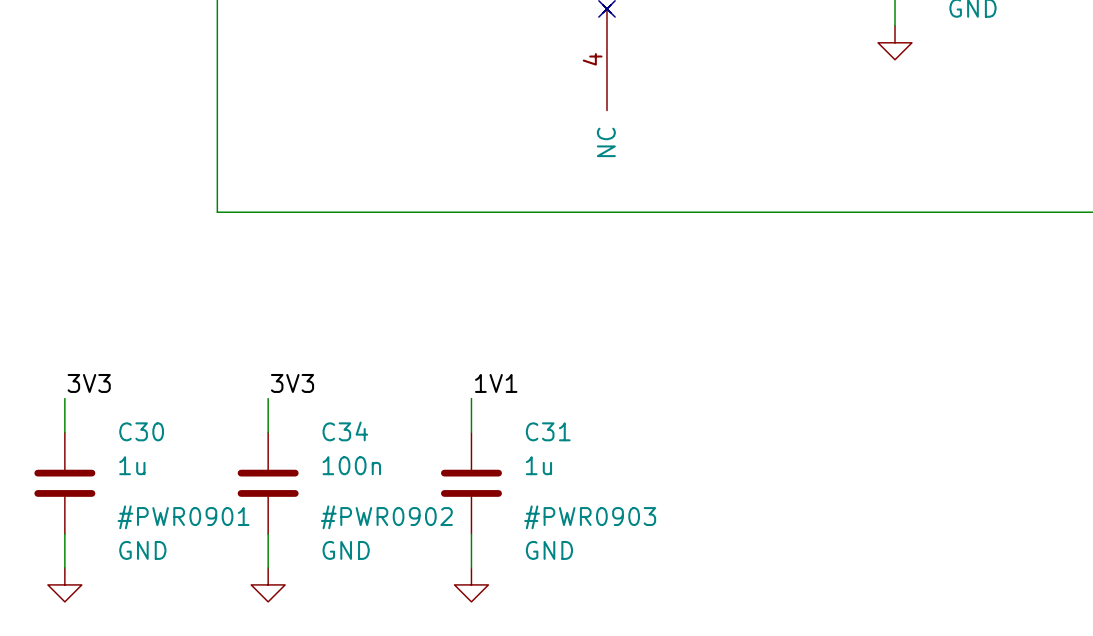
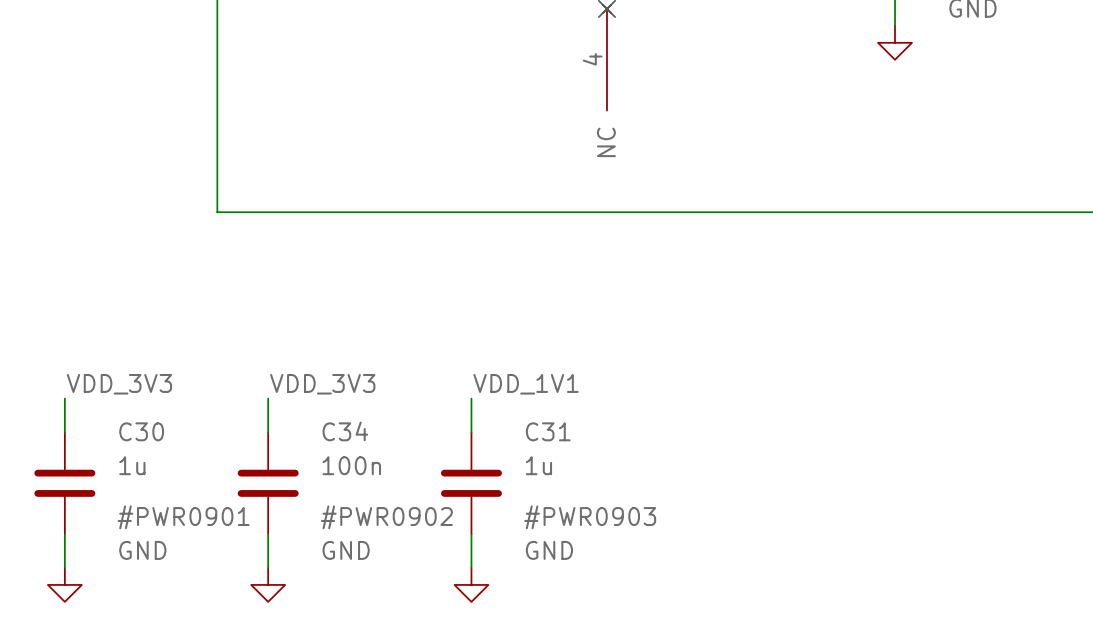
label: 3V3 (89, 383) -> VDD_3V3 (119, 384)
label: 3V3 (292, 383) -> VDD_3V3 (322, 384)
label: 1V1 (496, 383) -> VDD_1V1 (526, 384)

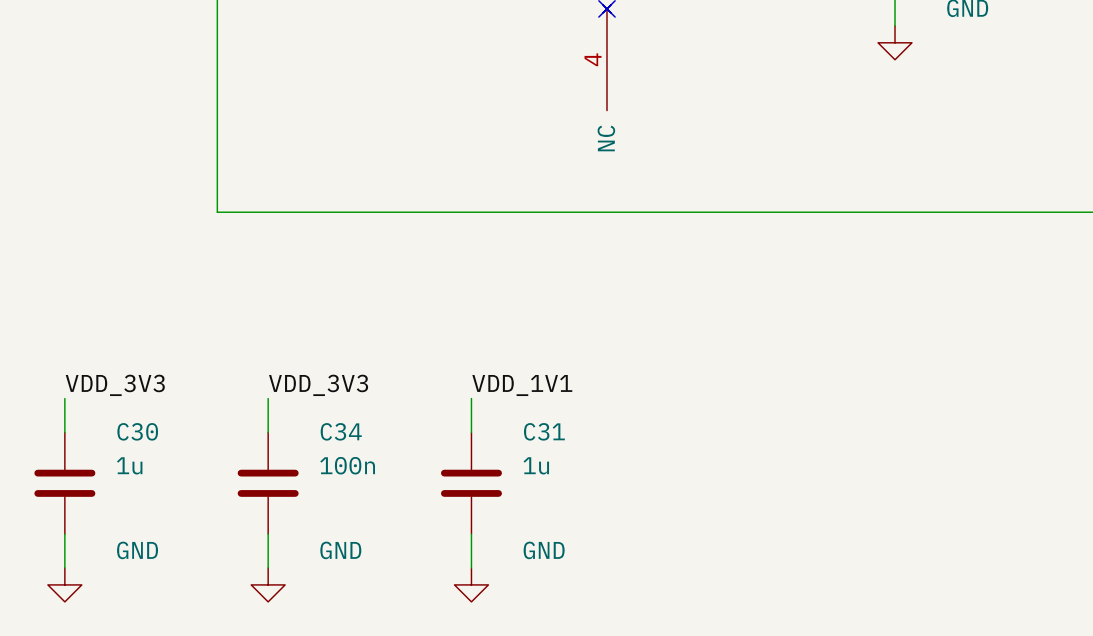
#PWR0901 name: #PWR0901 (183, 517) -> none
#PWR0902 name: #PWR0902 (386, 517) -> none
#PWR0903 name: #PWR0903 (590, 517) -> none

